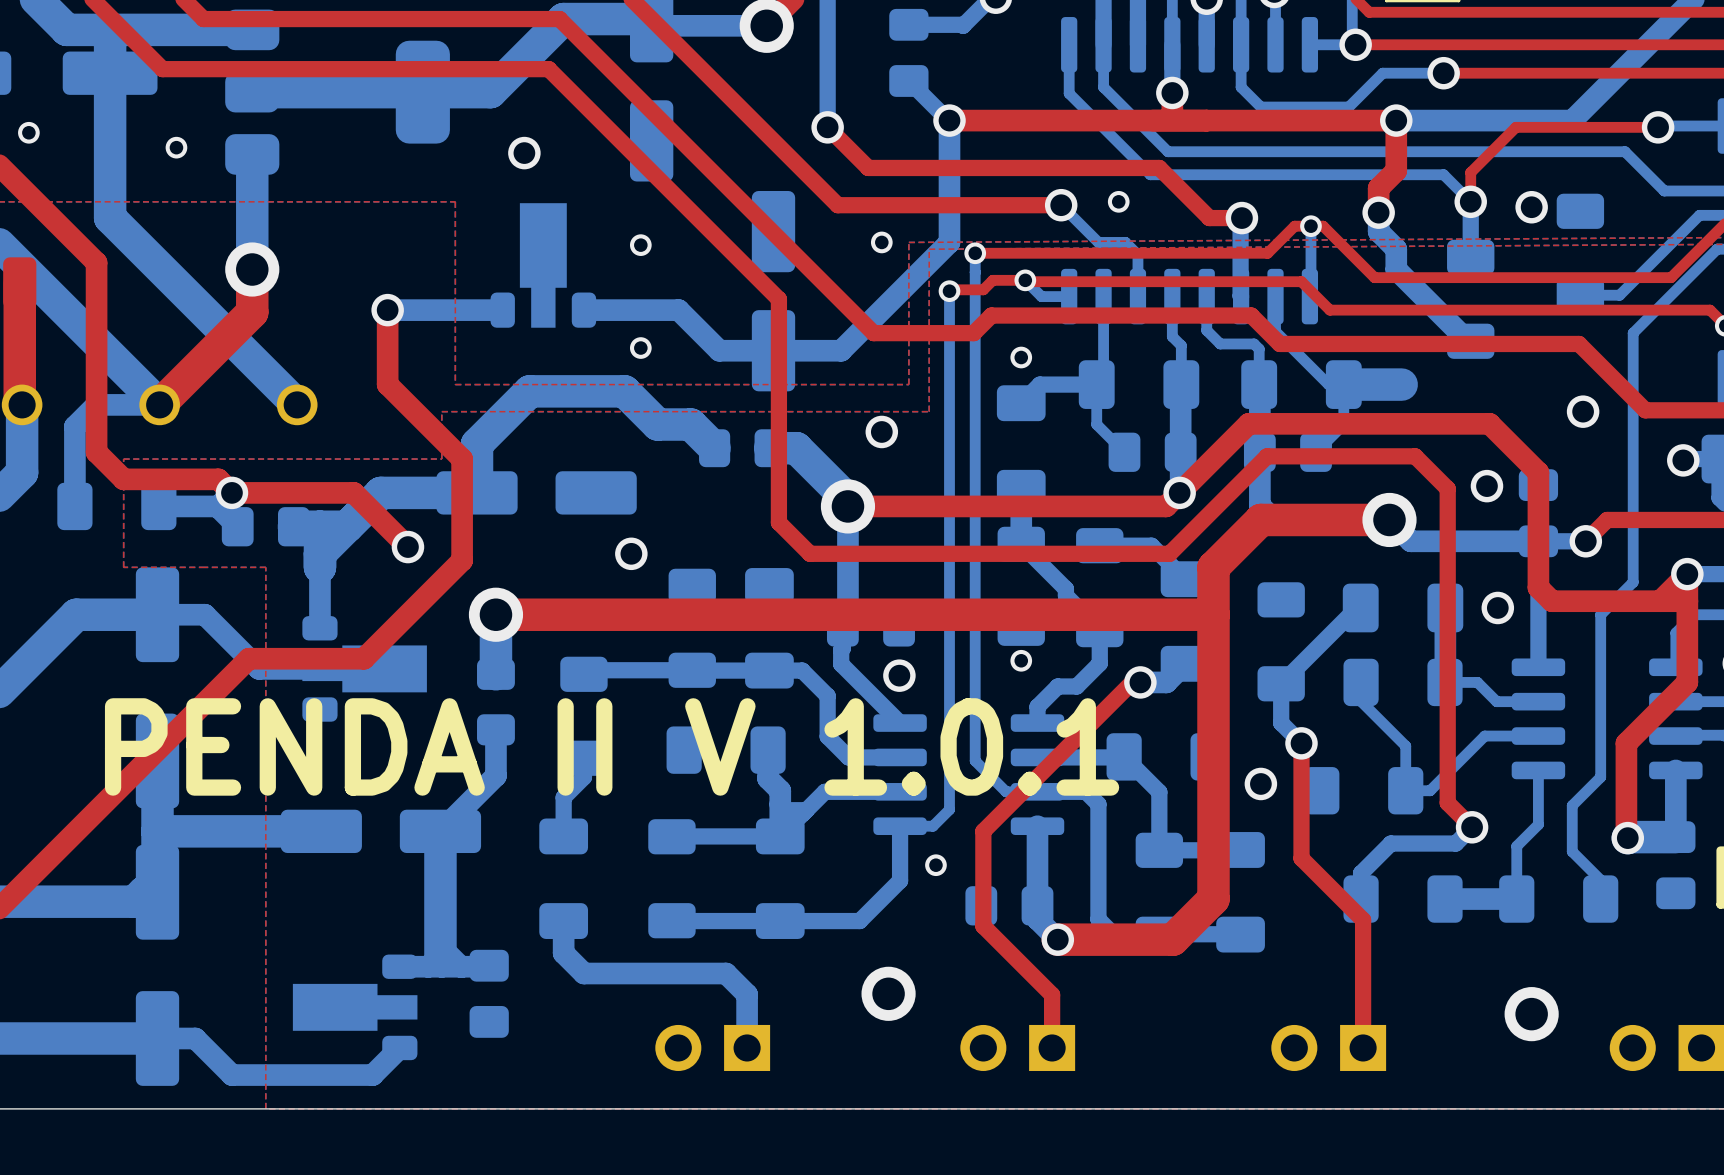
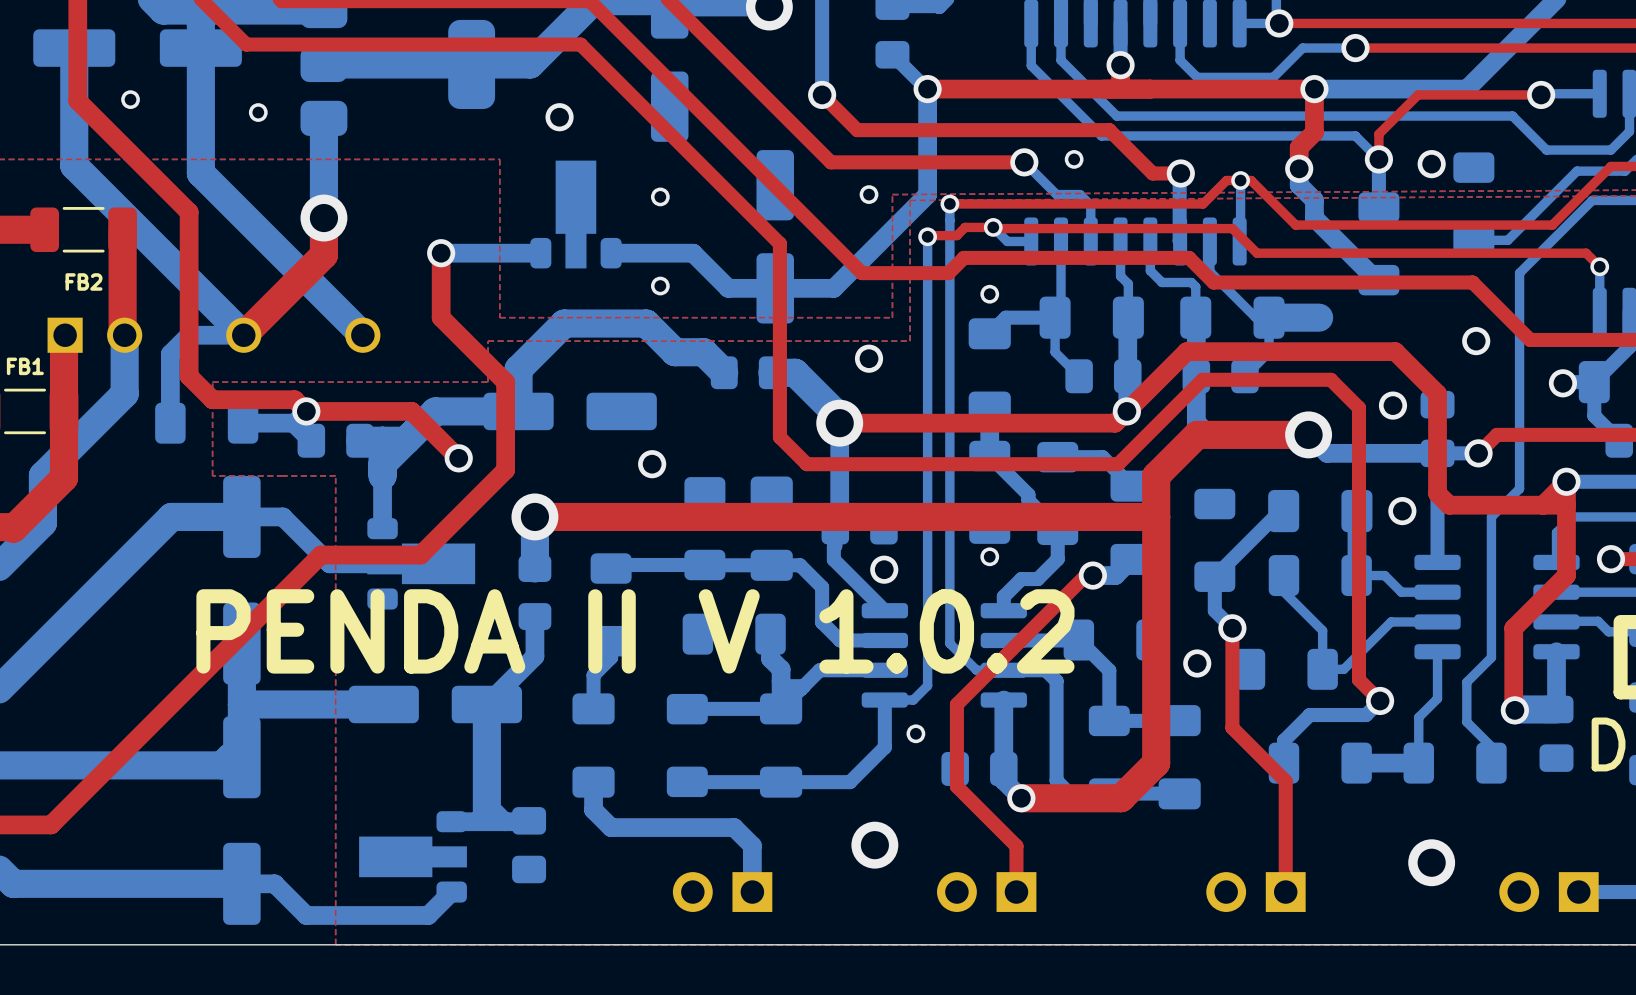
text: PENDA II V 1.0.1 (612, 746) -> PENDA II V 1.0.2 (635, 631)

